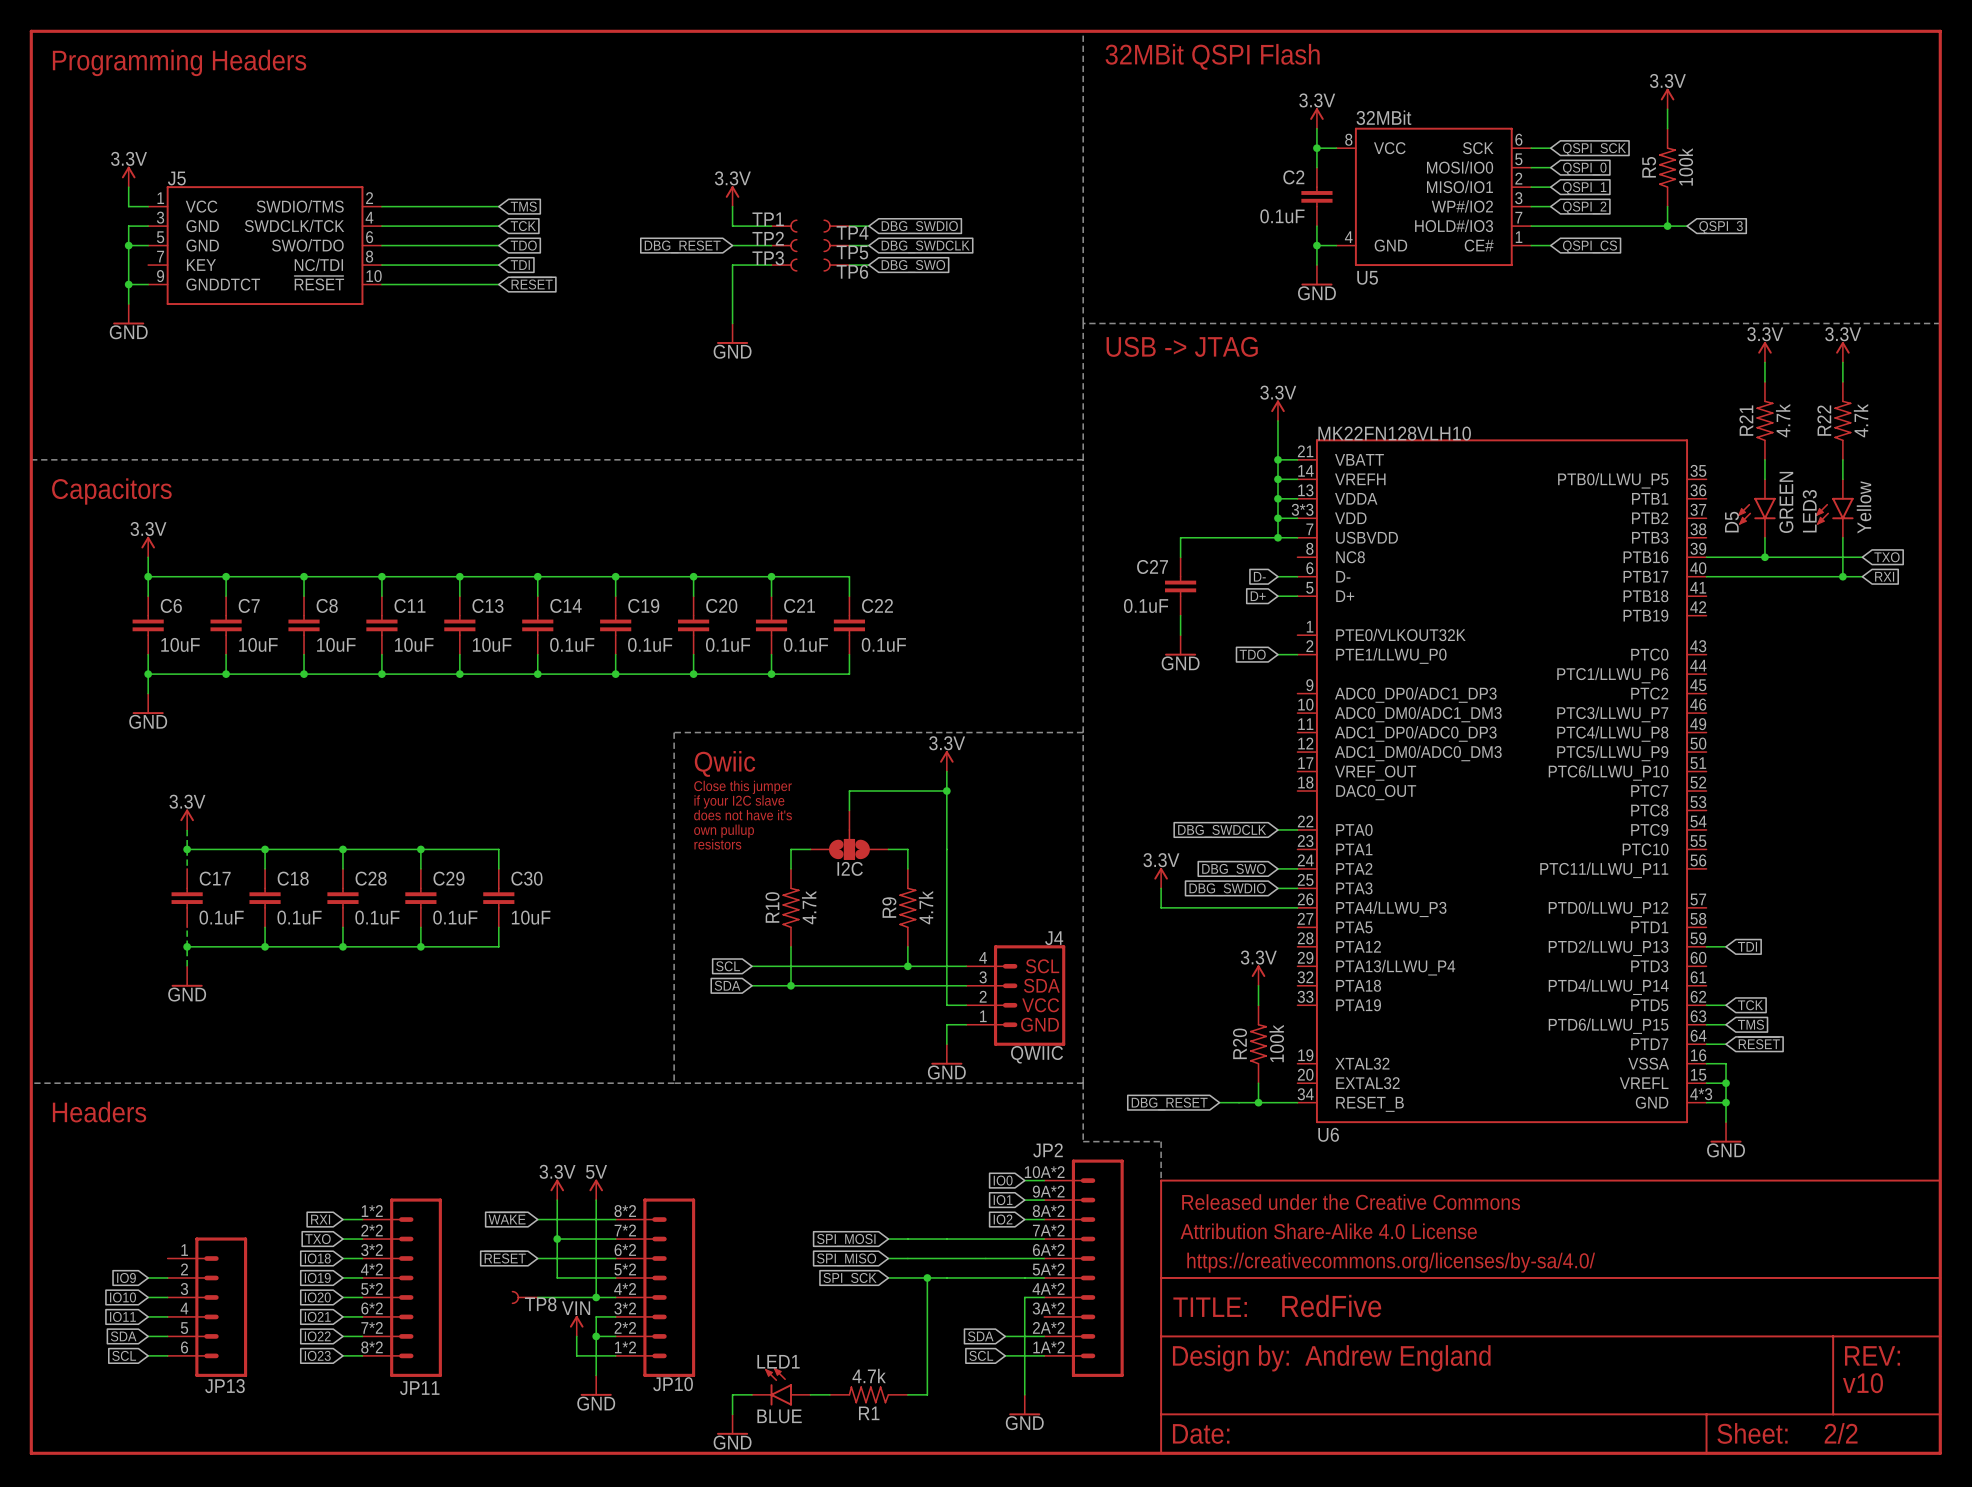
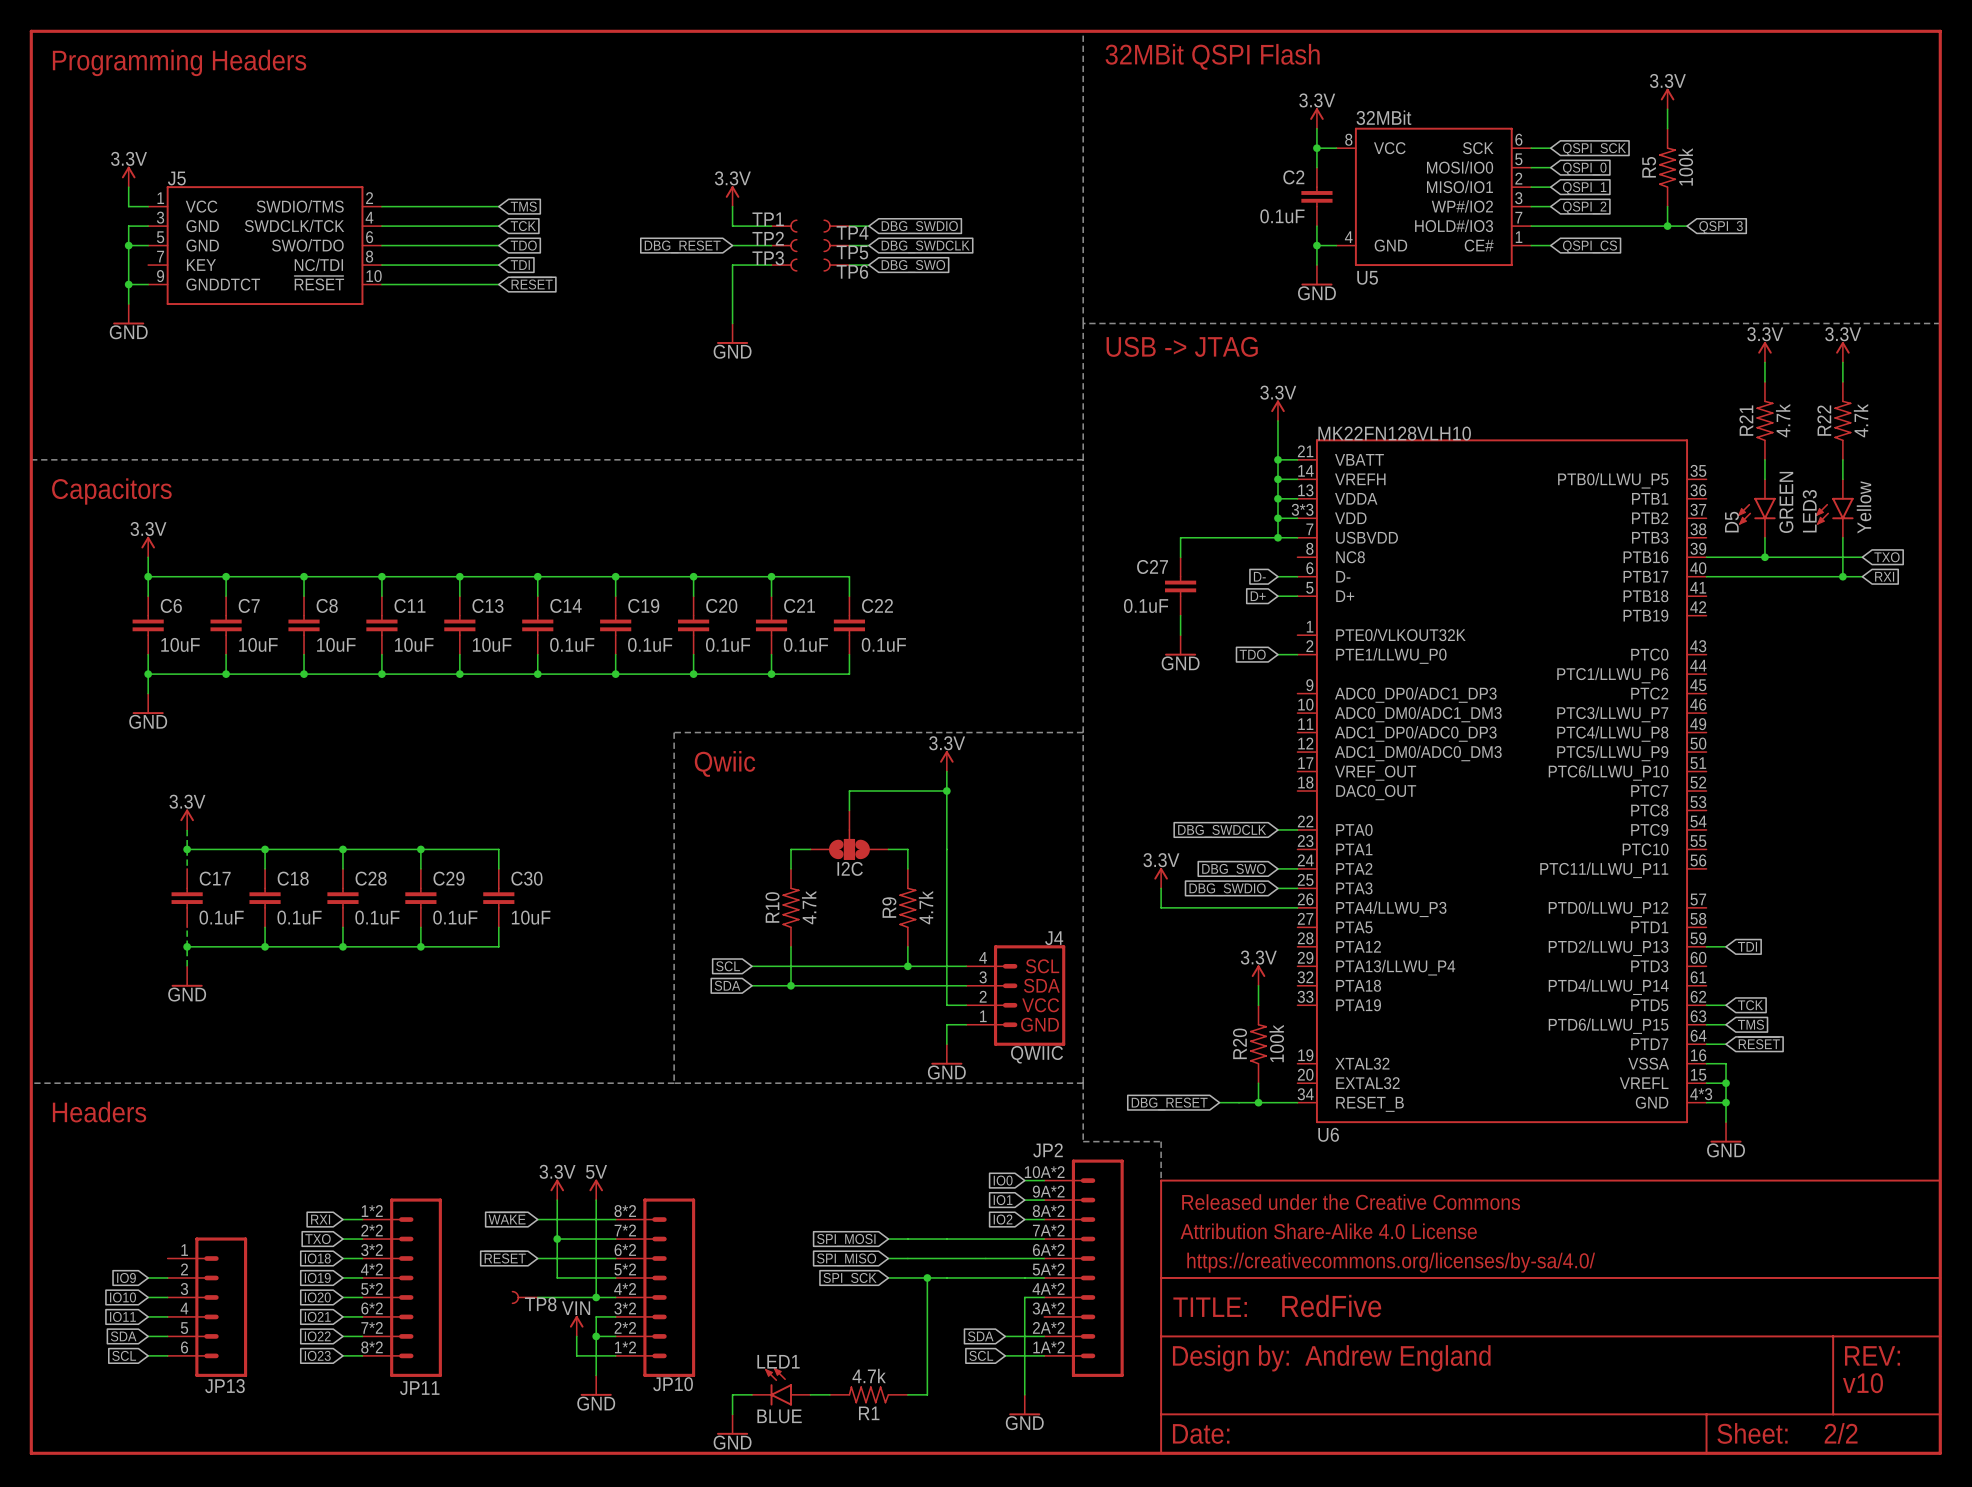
text: Close this jumper (743, 787) -> none
text: if your I2C slave (739, 801) -> none
text: does not have it's (743, 815) -> none
text: own pullup (724, 831) -> none
text: resistors (717, 844) -> none

